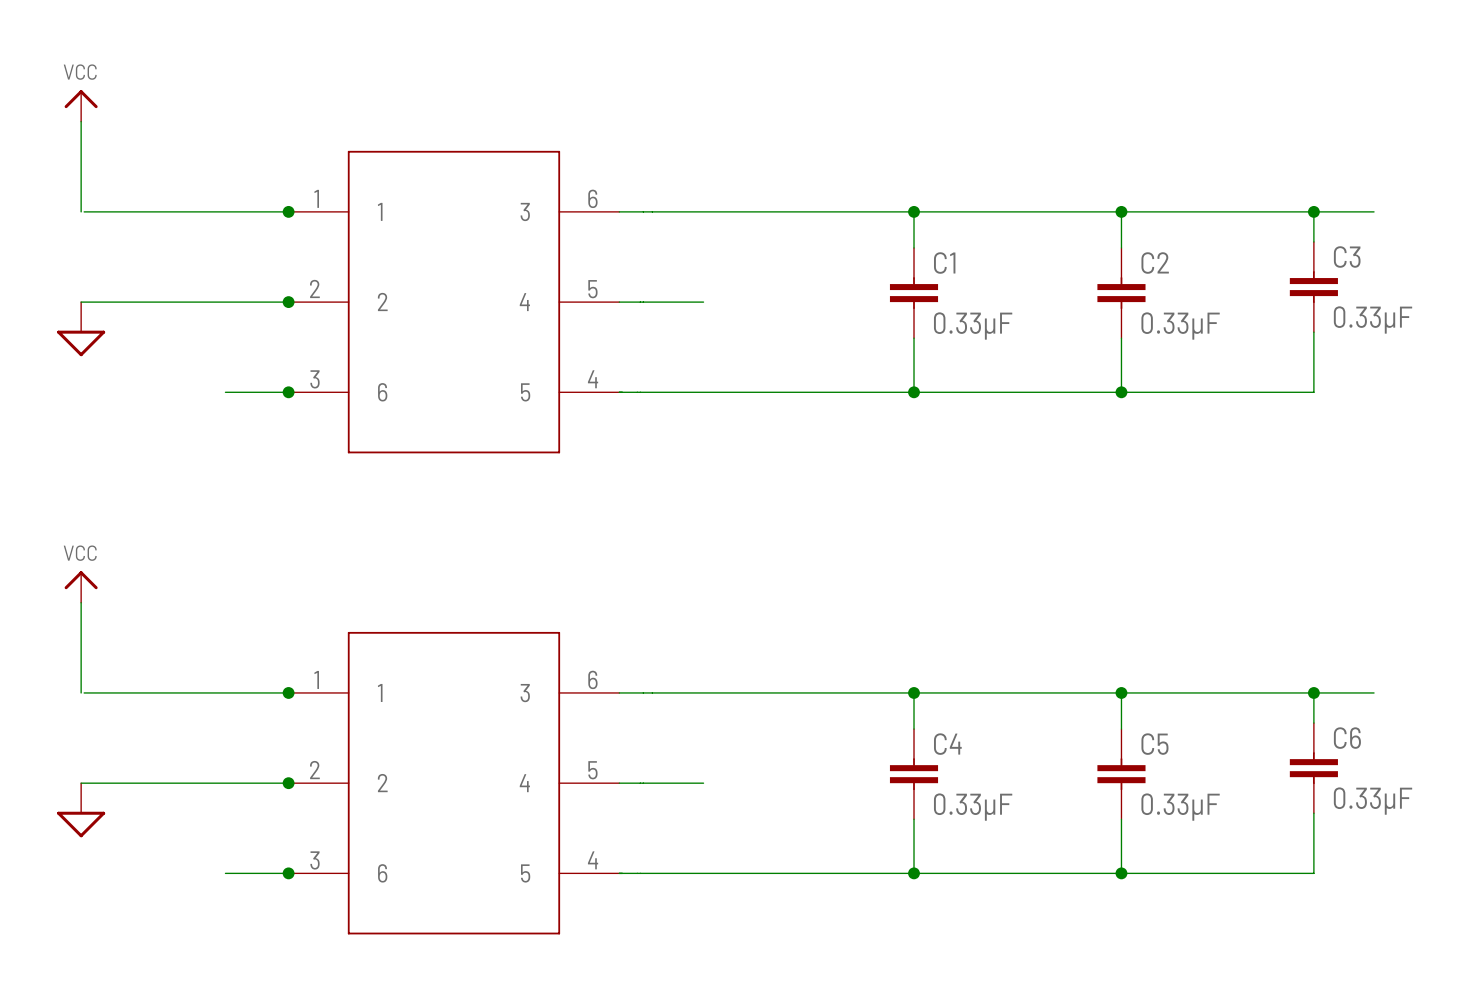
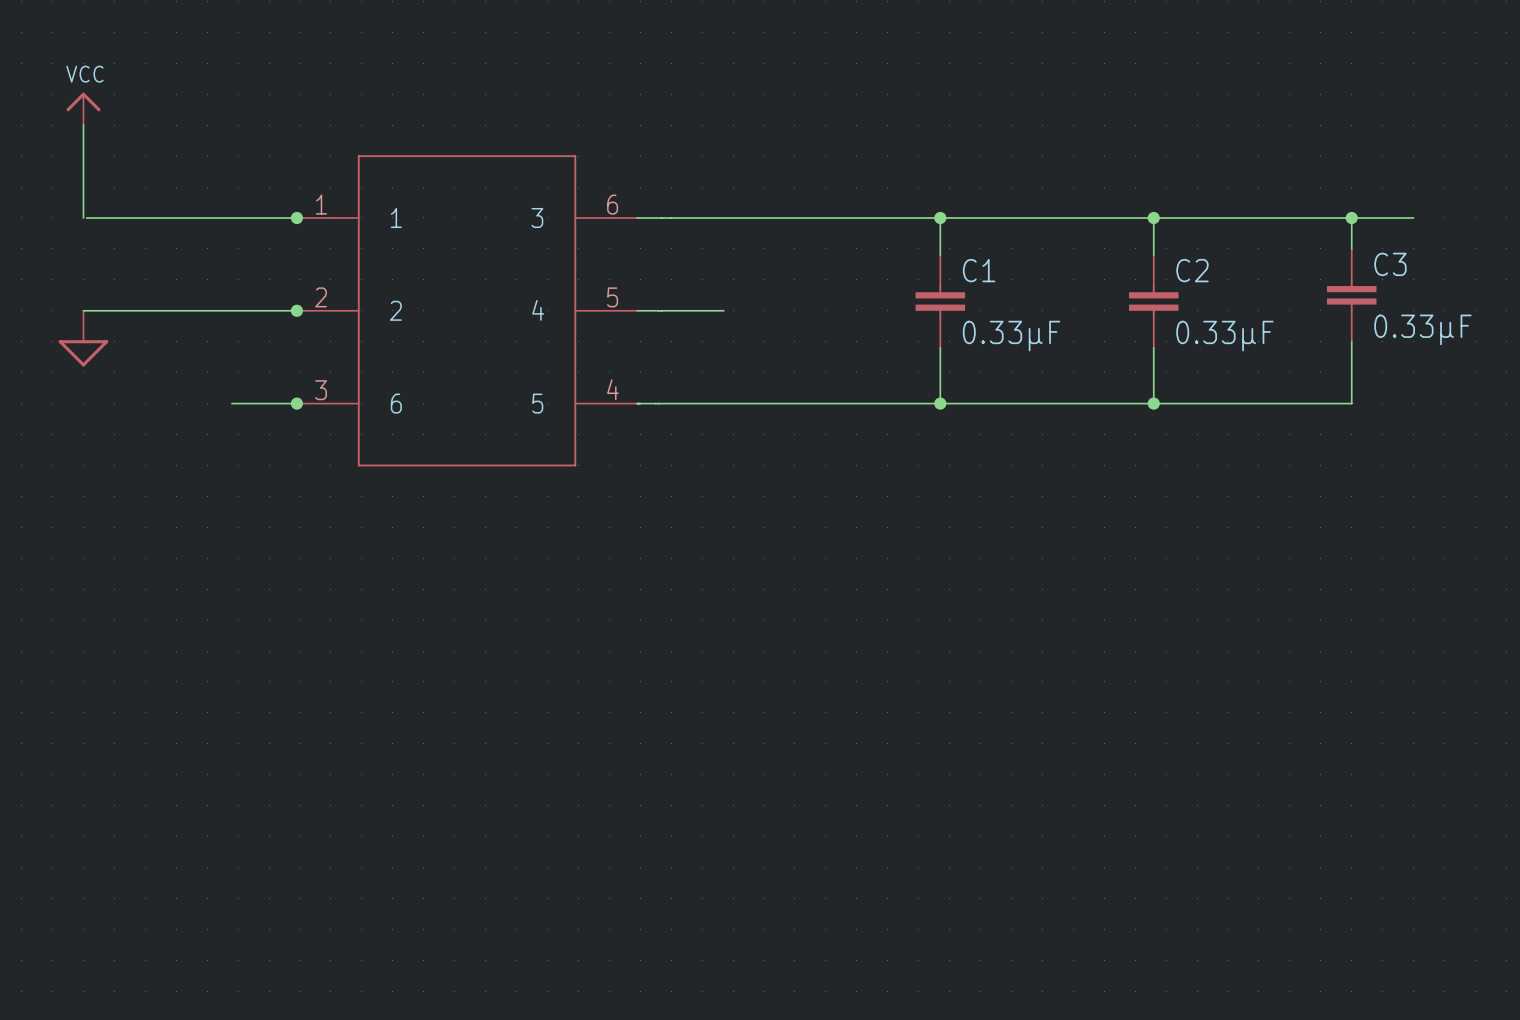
power symbol: VCC (81, 586) -> none
wire: (81, 602) (81, 692) -> none
wire: (84, 692) (291, 692) -> none
junction: (288, 692) -> none
wire: (619, 692) (1374, 692) -> none
wire: (914, 692) (914, 729) -> none
junction: (914, 692) -> none
wire: (1121, 692) (1121, 729) -> none
junction: (1121, 692) -> none
wire: (1313, 692) (1313, 723) -> none
junction: (1313, 692) -> none
C6: 0.33µF (1313, 768) -> none
C4: 0.33µF (914, 774) -> none
C5: 0.33µF (1121, 774) -> none
wire: (81, 783) (291, 783) -> none
junction: (288, 783) -> none
part: (453, 783) -> none
wire: (619, 783) (703, 783) -> none
power symbol: (81, 810) -> none
wire: (1313, 813) (1313, 873) (619, 873) -> none
wire: (914, 819) (914, 873) -> none
wire: (1121, 819) (1121, 873) -> none
wire: (225, 873) (291, 873) -> none
junction: (288, 873) -> none
junction: (914, 873) -> none
junction: (1121, 873) -> none

